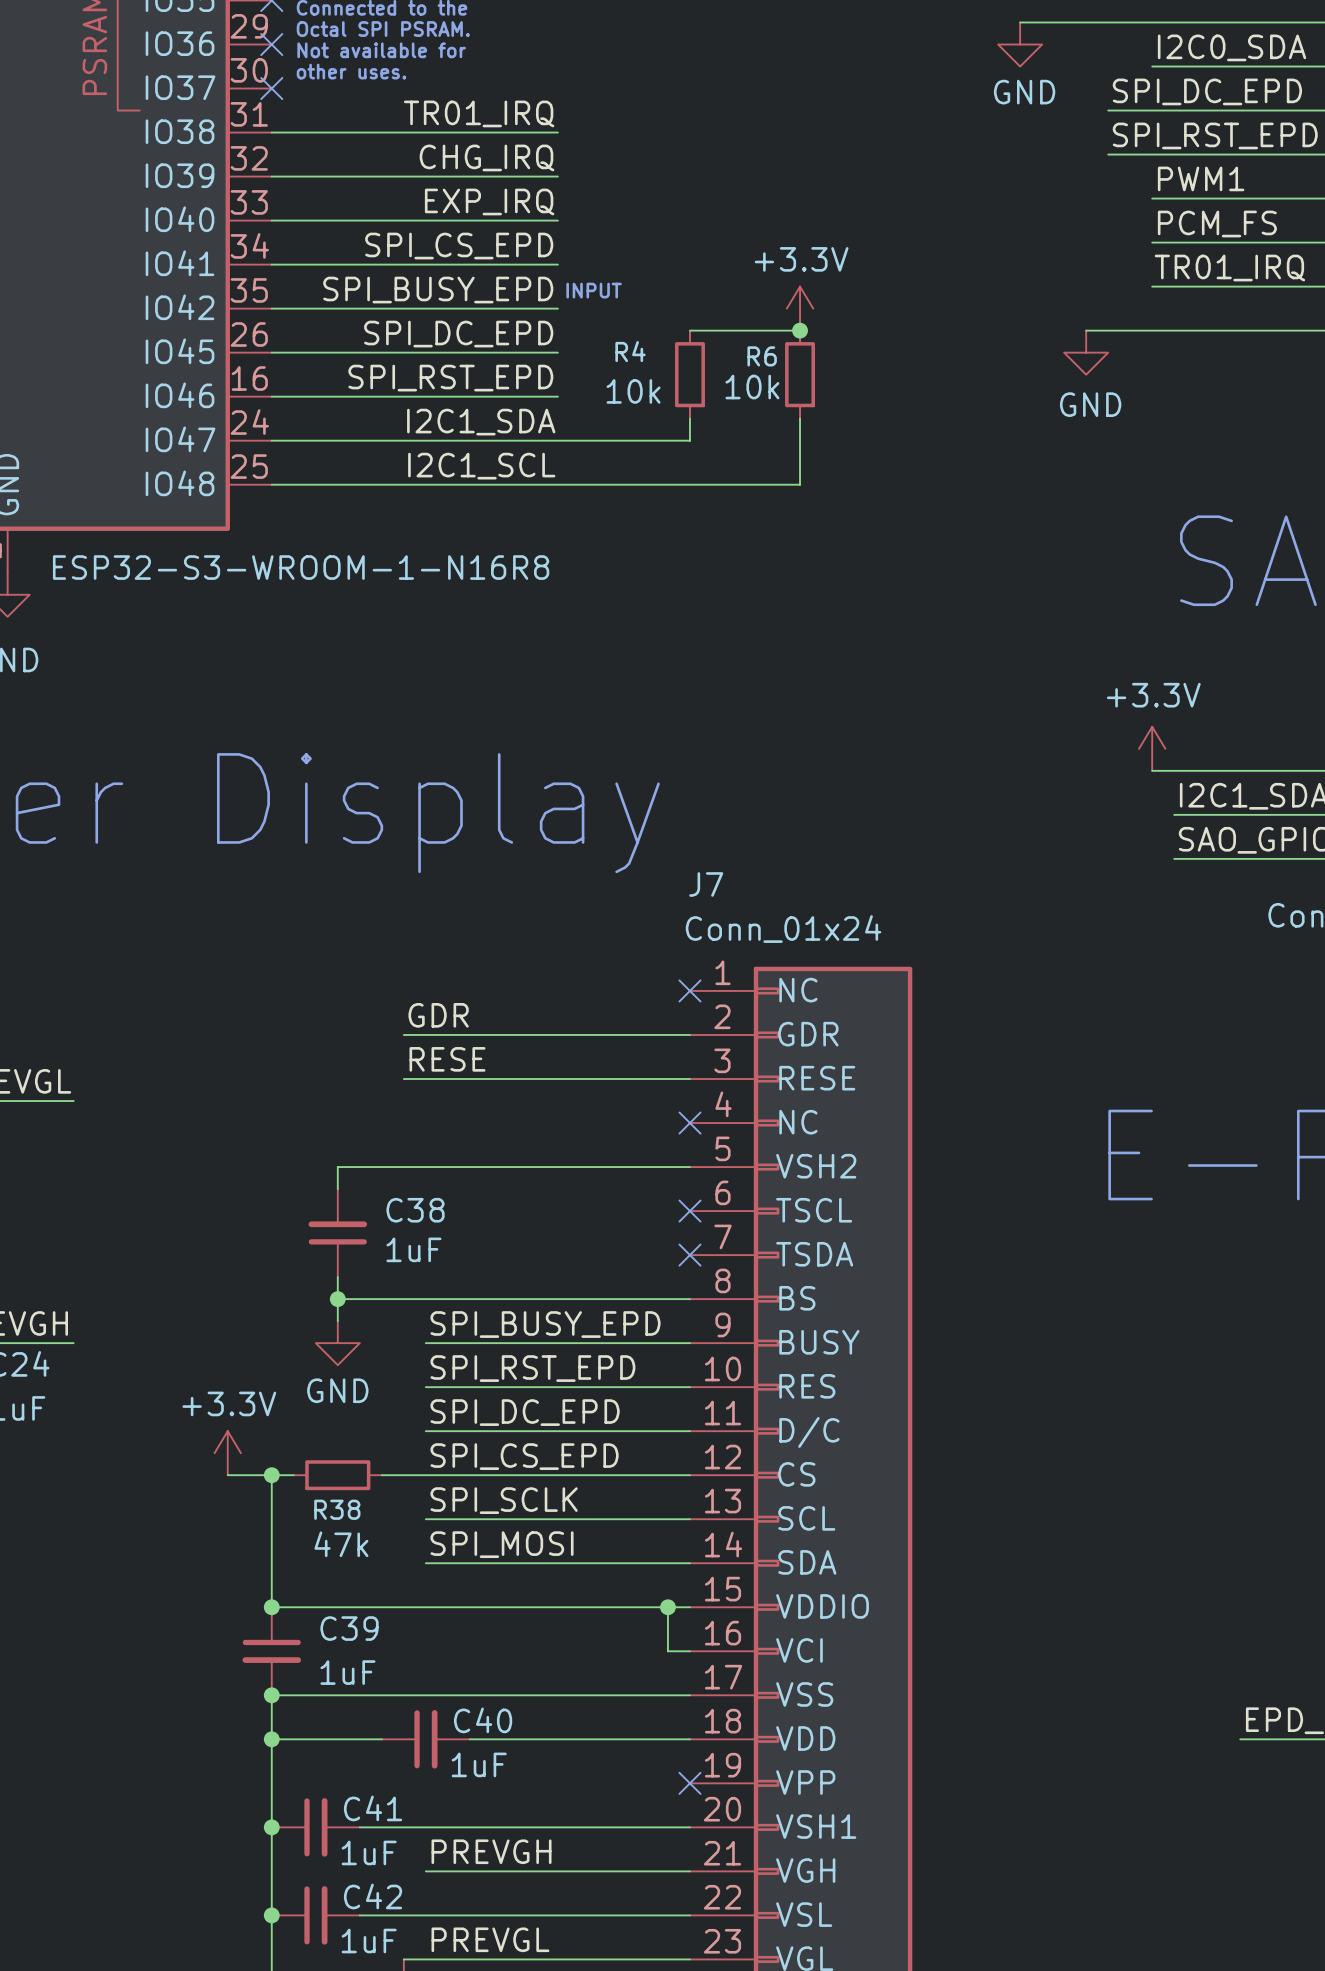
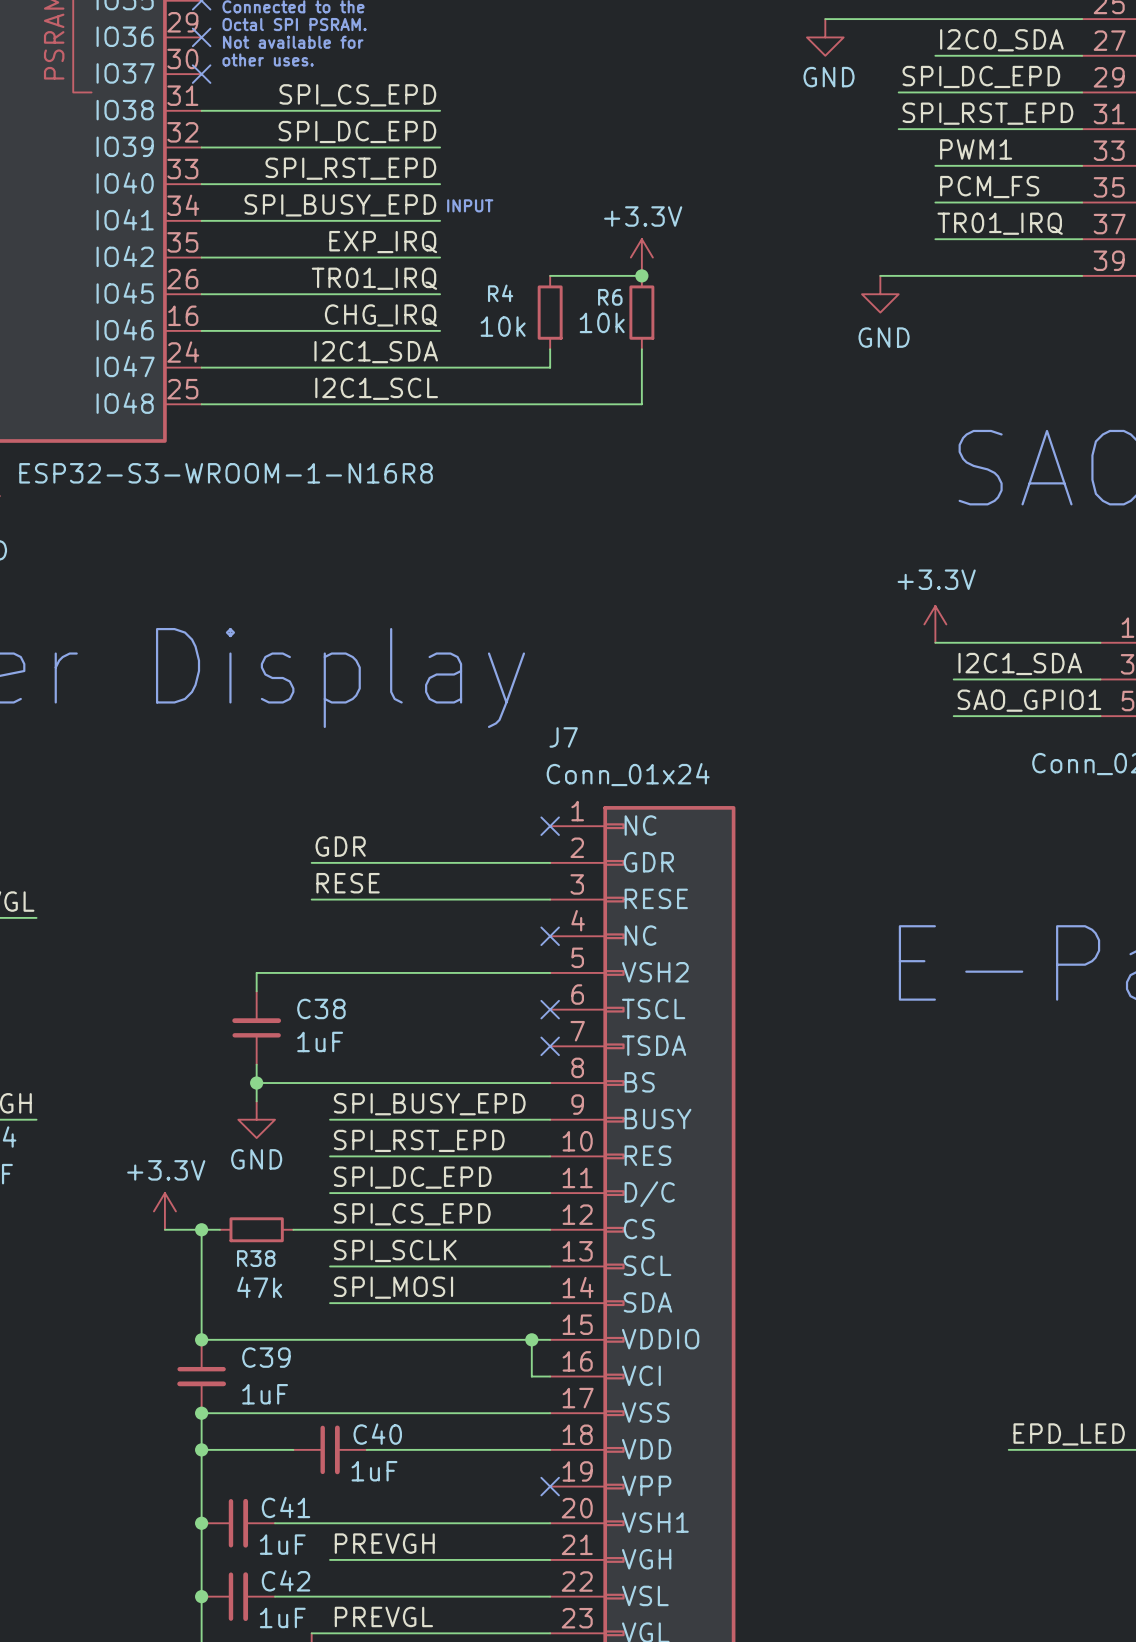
label: TR01_IRQ (479, 113) -> SPI_CS_EPD (357, 95)
label: CHG_IRQ (487, 157) -> SPI_DC_EPD (357, 131)
label: EXP_IRQ (489, 201) -> SPI_RST_EPD (350, 168)
label: SPI_CS_EPD (459, 246) -> SPI_BUSY_EPD (340, 205)
label: SPI_BUSY_EPD (438, 290) -> EXP_IRQ (383, 242)
text position: INPUT (594, 290) -> INPUT (470, 205)
label: SPI_DC_EPD (458, 334) -> TR01_IRQ (374, 278)
label: SPI_RST_EPD (450, 378) -> CHG_IRQ (380, 315)

